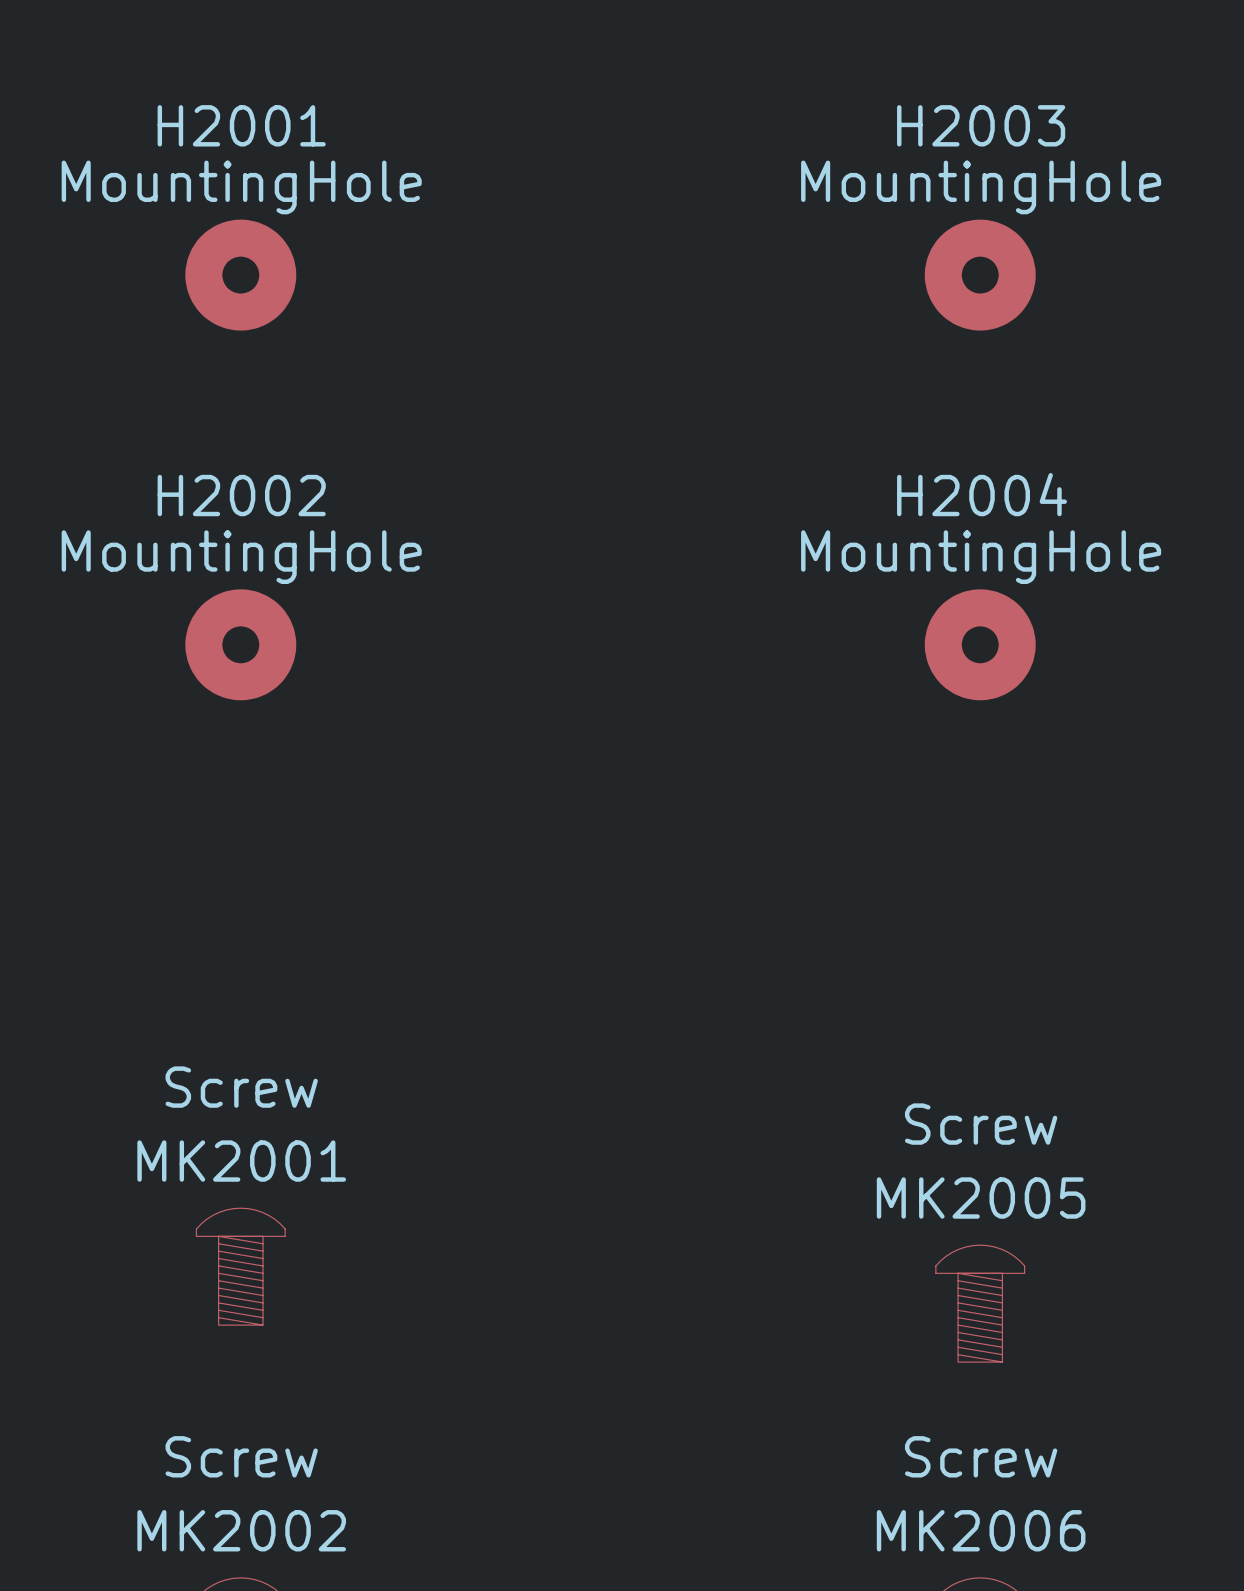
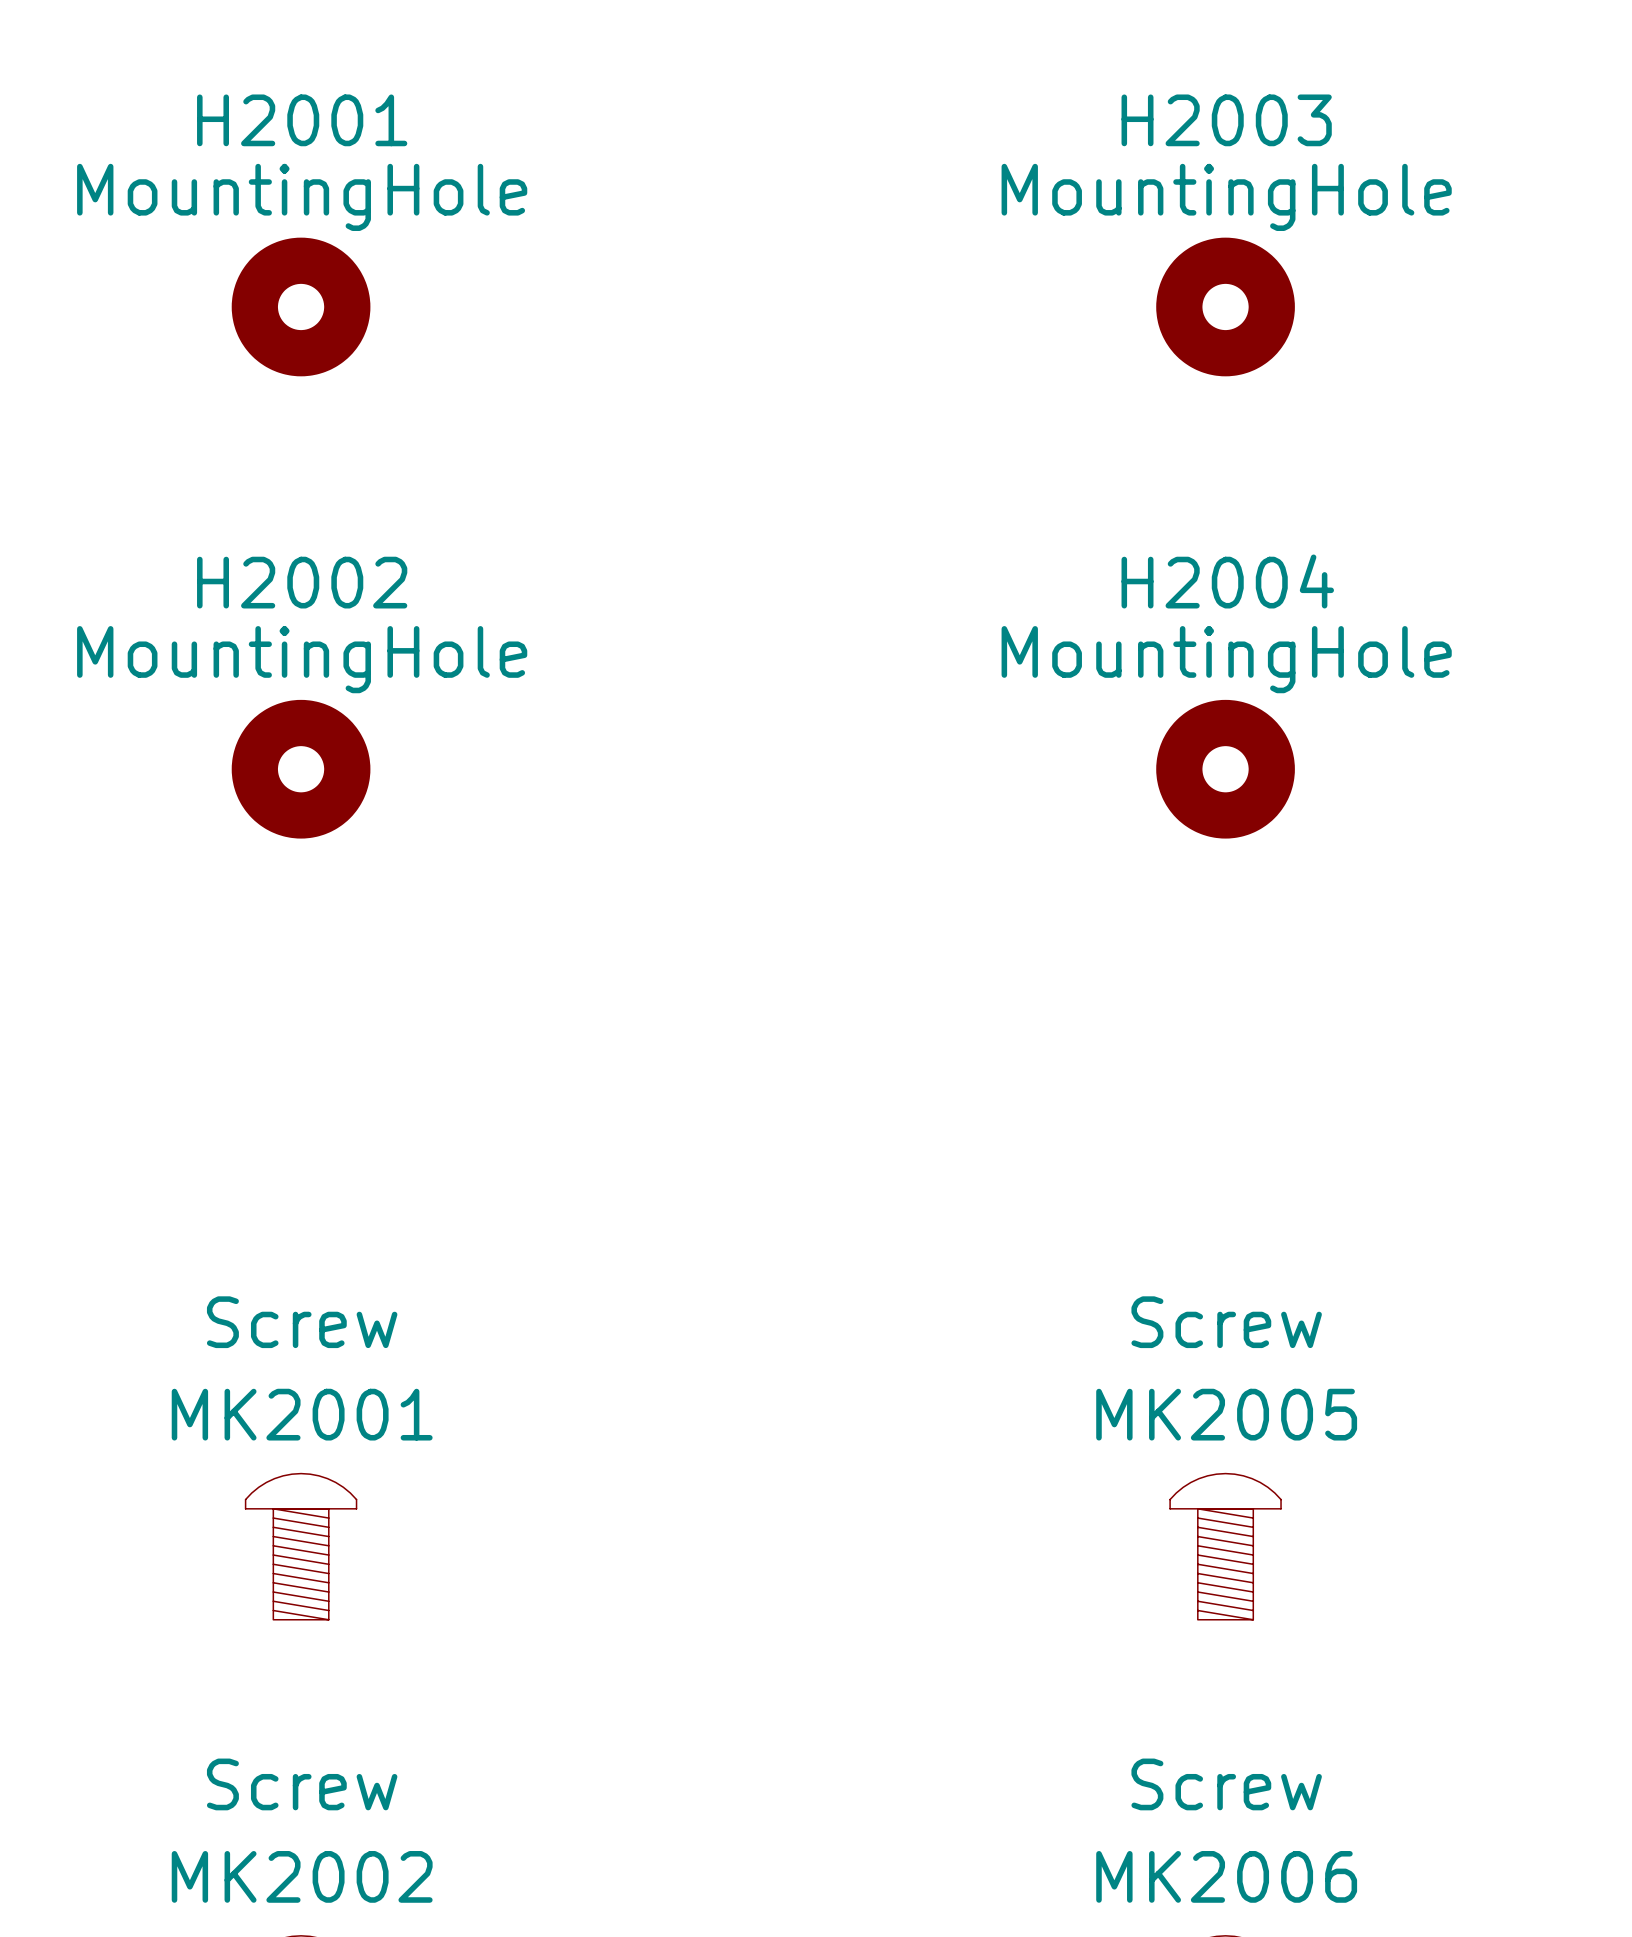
MK2005 position: (980, 1303) -> (1225, 1546)

